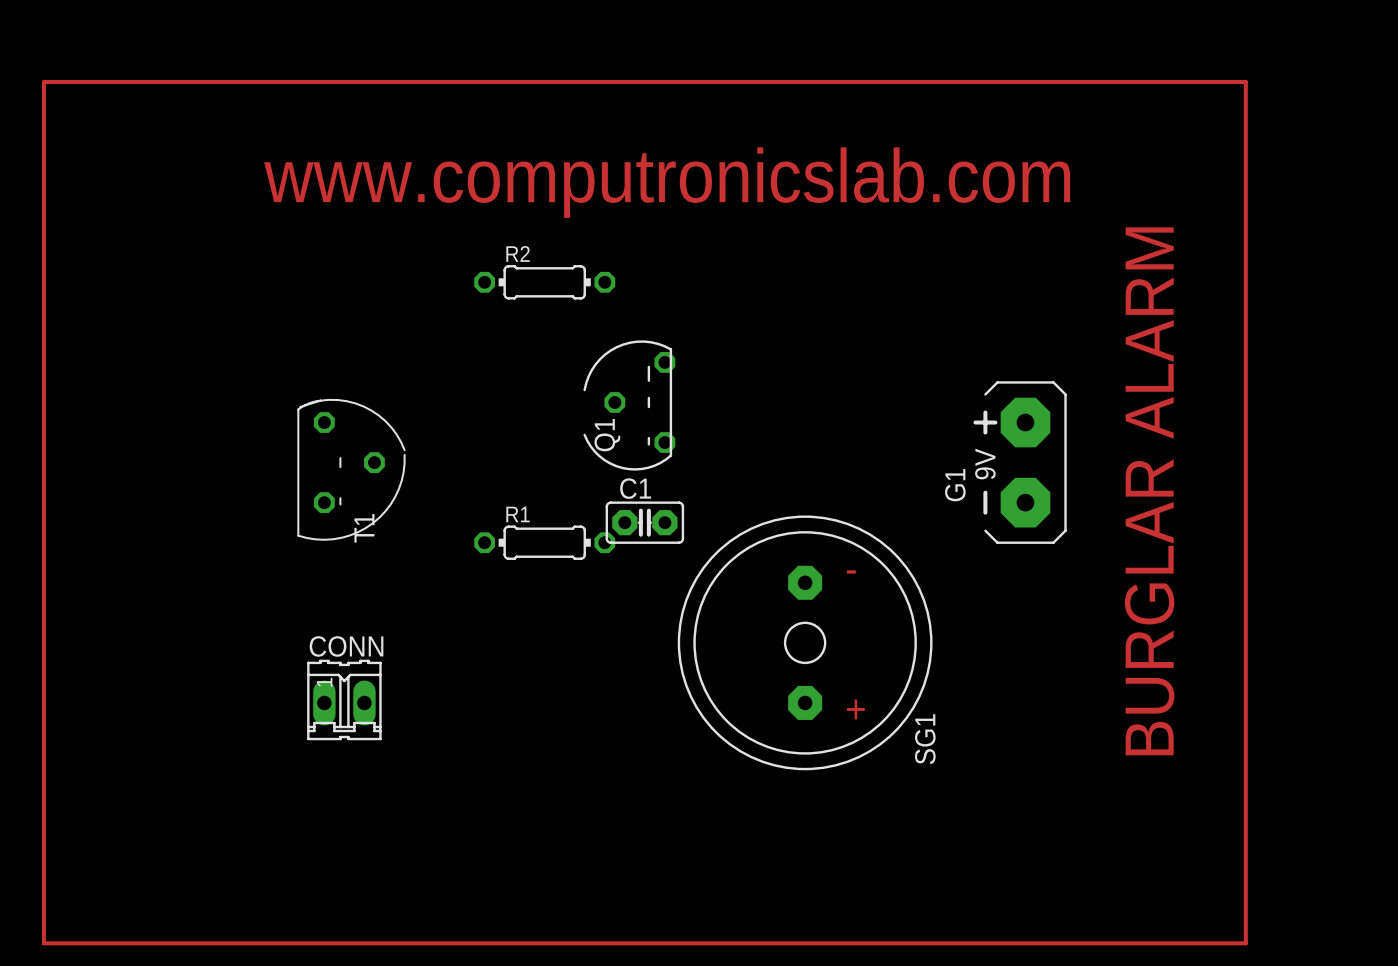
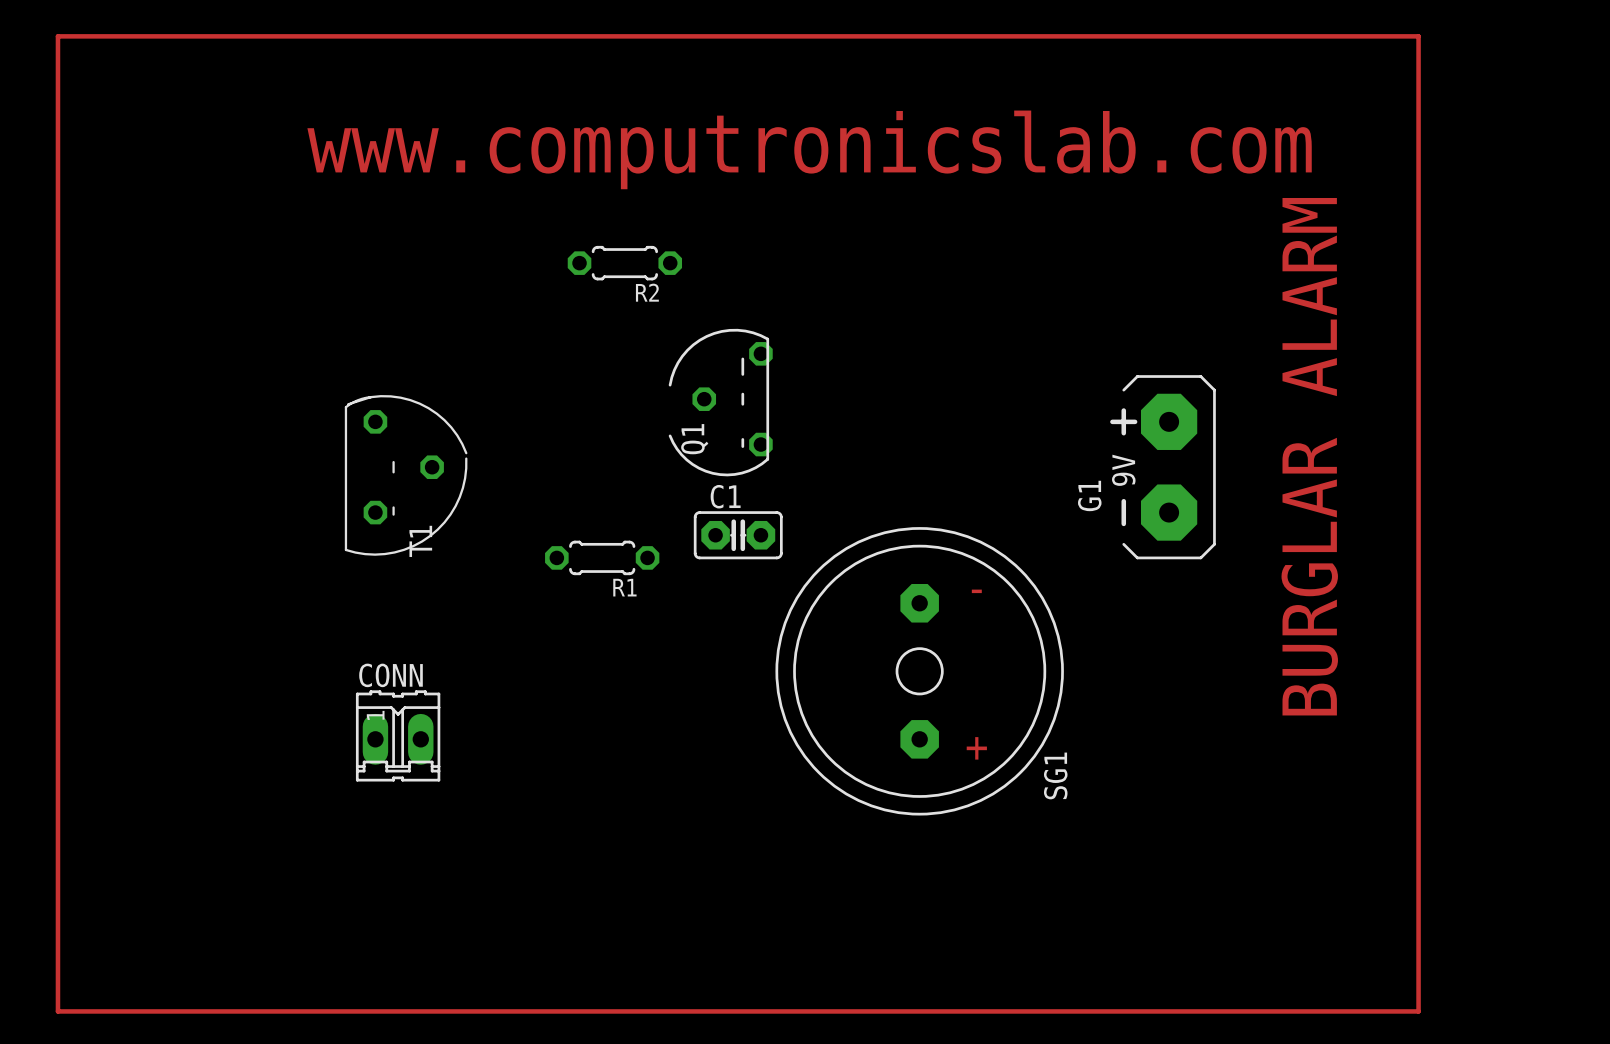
R2 name position: R2 (518, 253) -> R2 (647, 292)
R2 footprint: [474, 265, 616, 300] -> [567, 245, 683, 281]
R1 name position: R1 (518, 514) -> R1 (624, 587)
R1 footprint: [474, 525, 616, 560] -> [545, 540, 660, 576]

